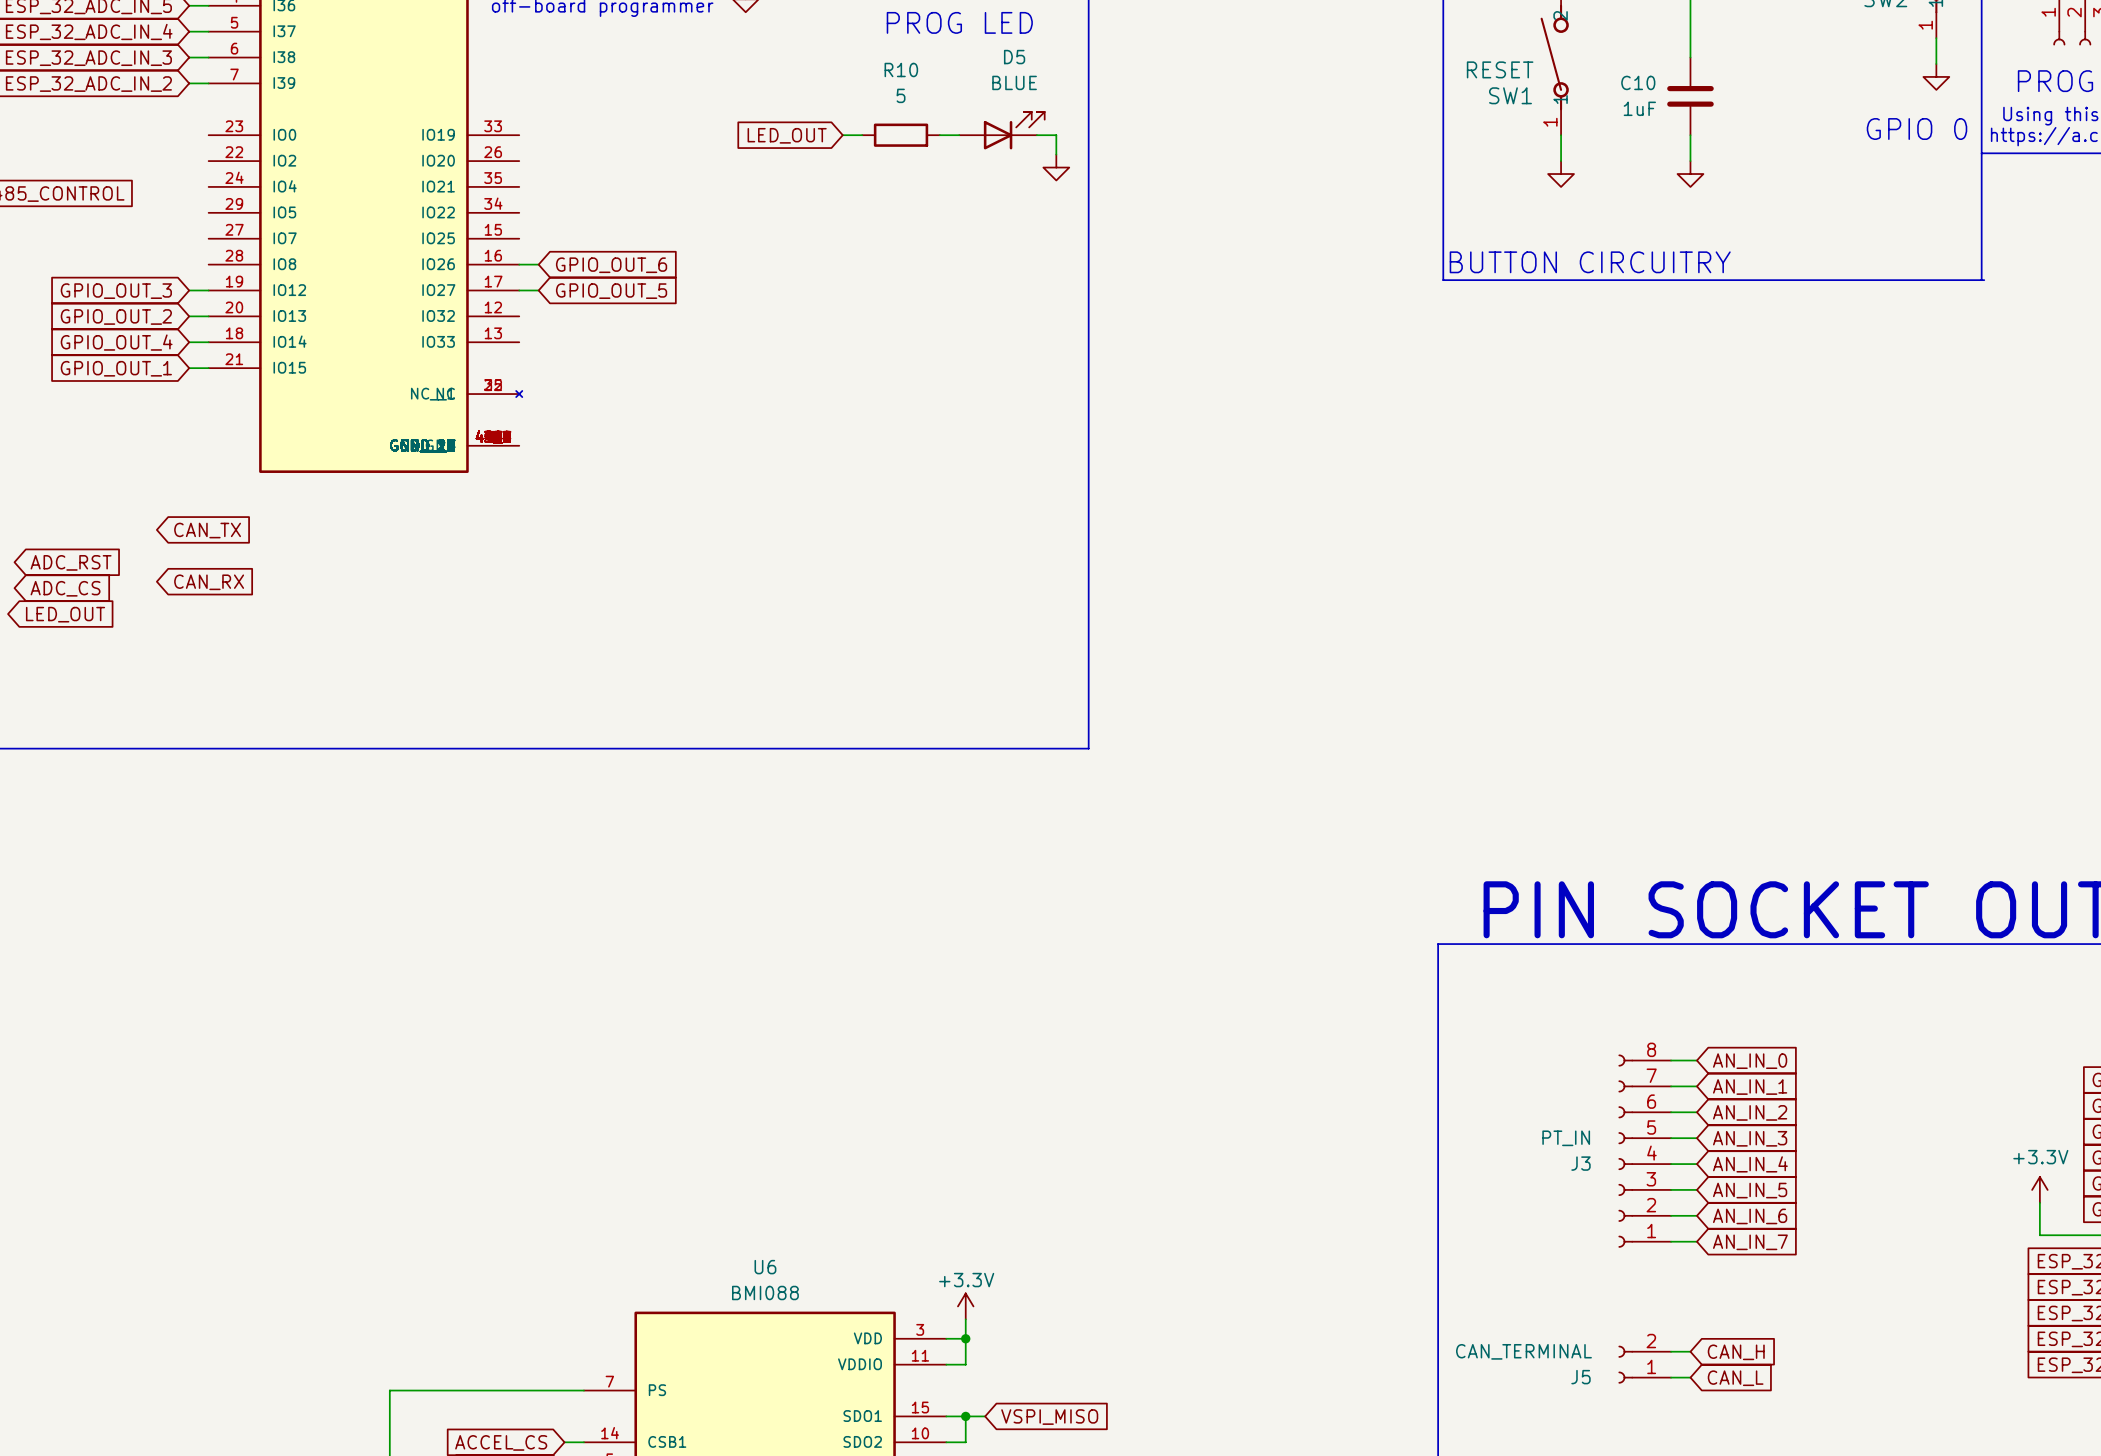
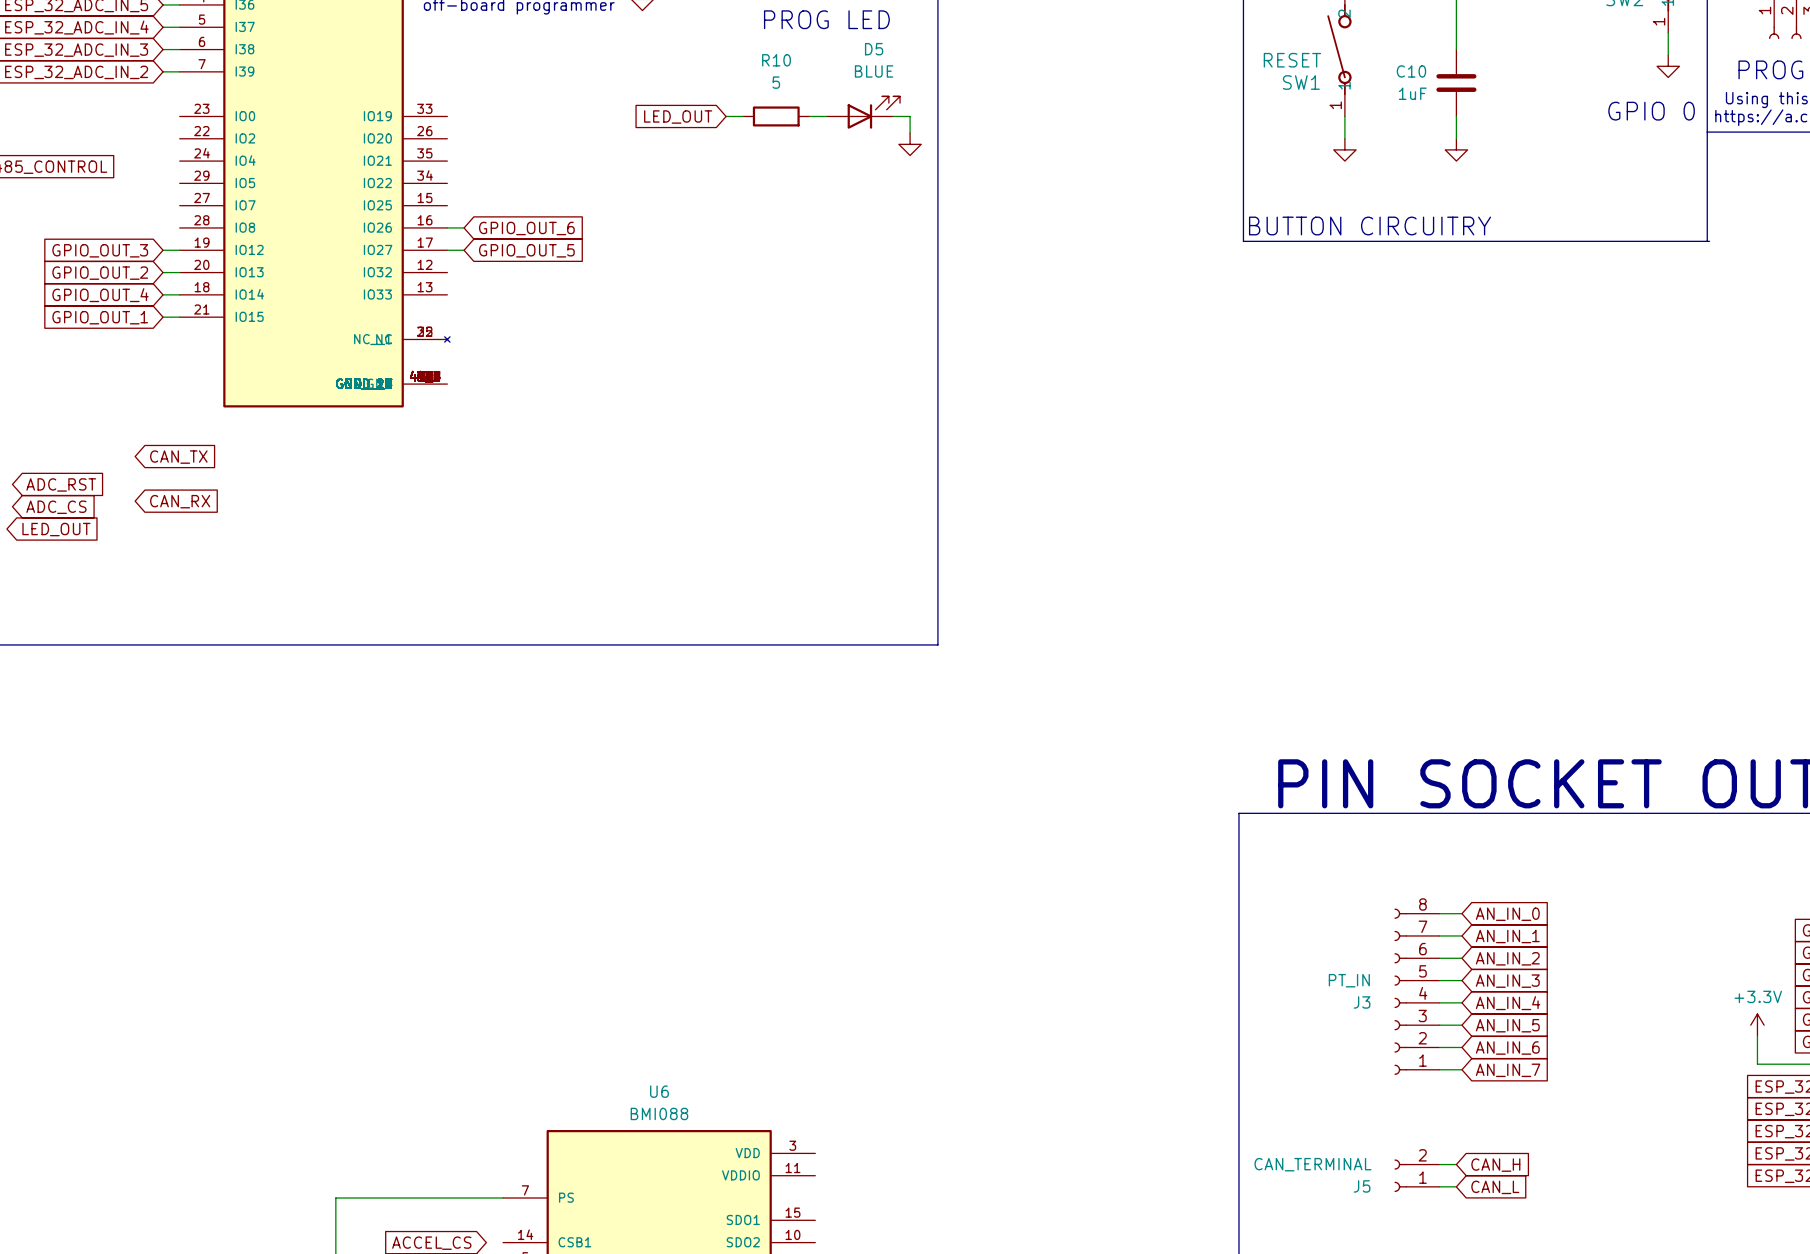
power symbol: +3.3V (965, 1306) -> none
wire: (965, 1319) (965, 1364) (946, 1364) -> none
wire: (946, 1338) (965, 1338) -> none
junction: (965, 1338) -> none
wire: (946, 1416) (985, 1416) -> none
wire: (965, 1416) (965, 1442) (946, 1442) -> none
junction: (965, 1416) -> none
global label: VSPI_MISO (1049, 1417) -> none
wire: (564, 1442) (583, 1442) -> none

